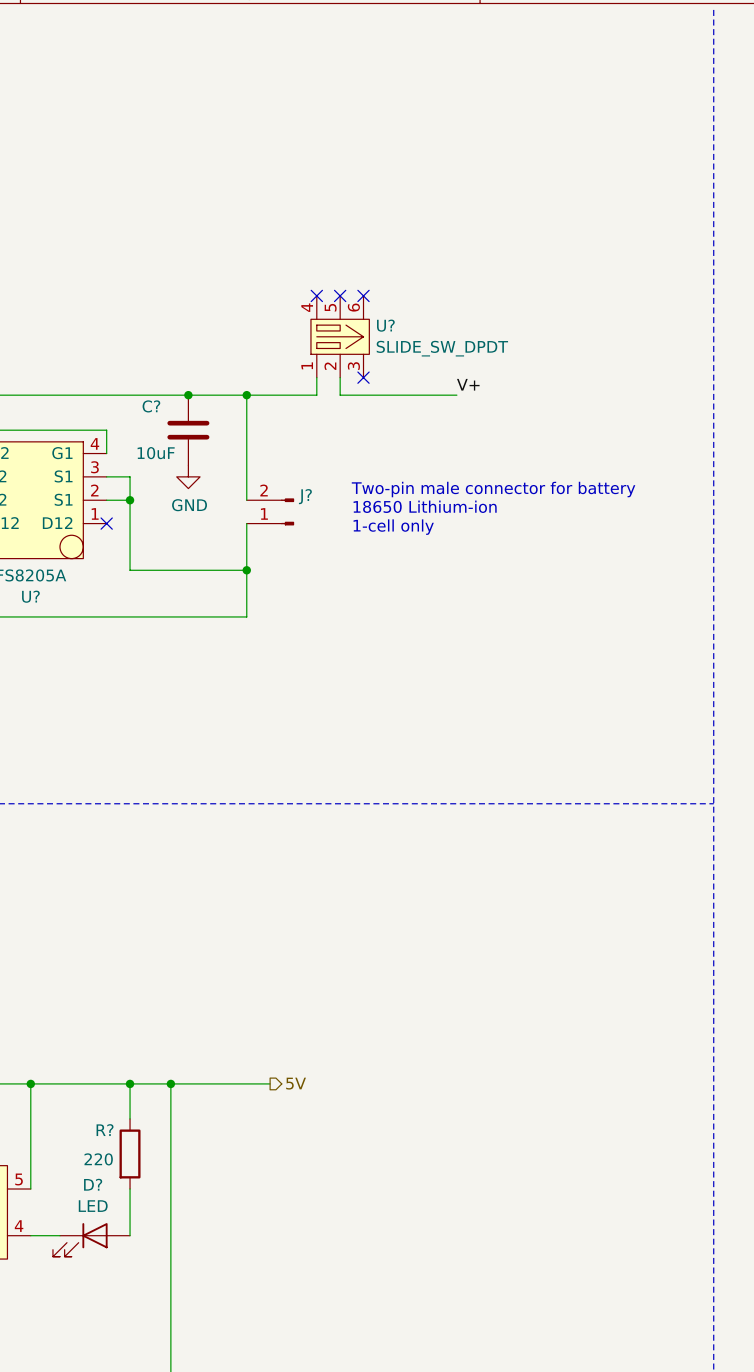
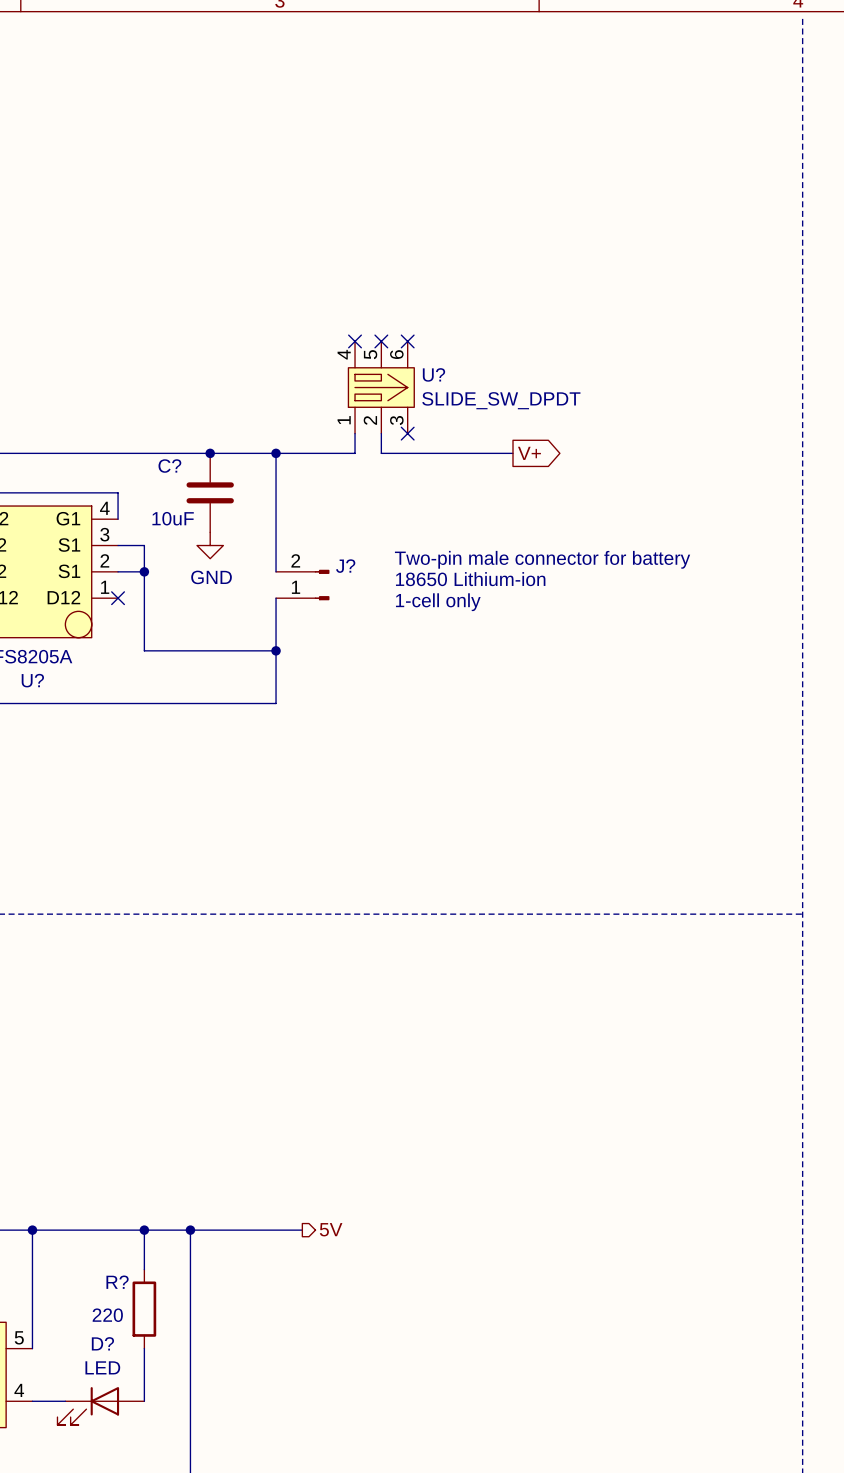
label: V+ (468, 384) -> none
global label: none -> V+ (529, 453)

